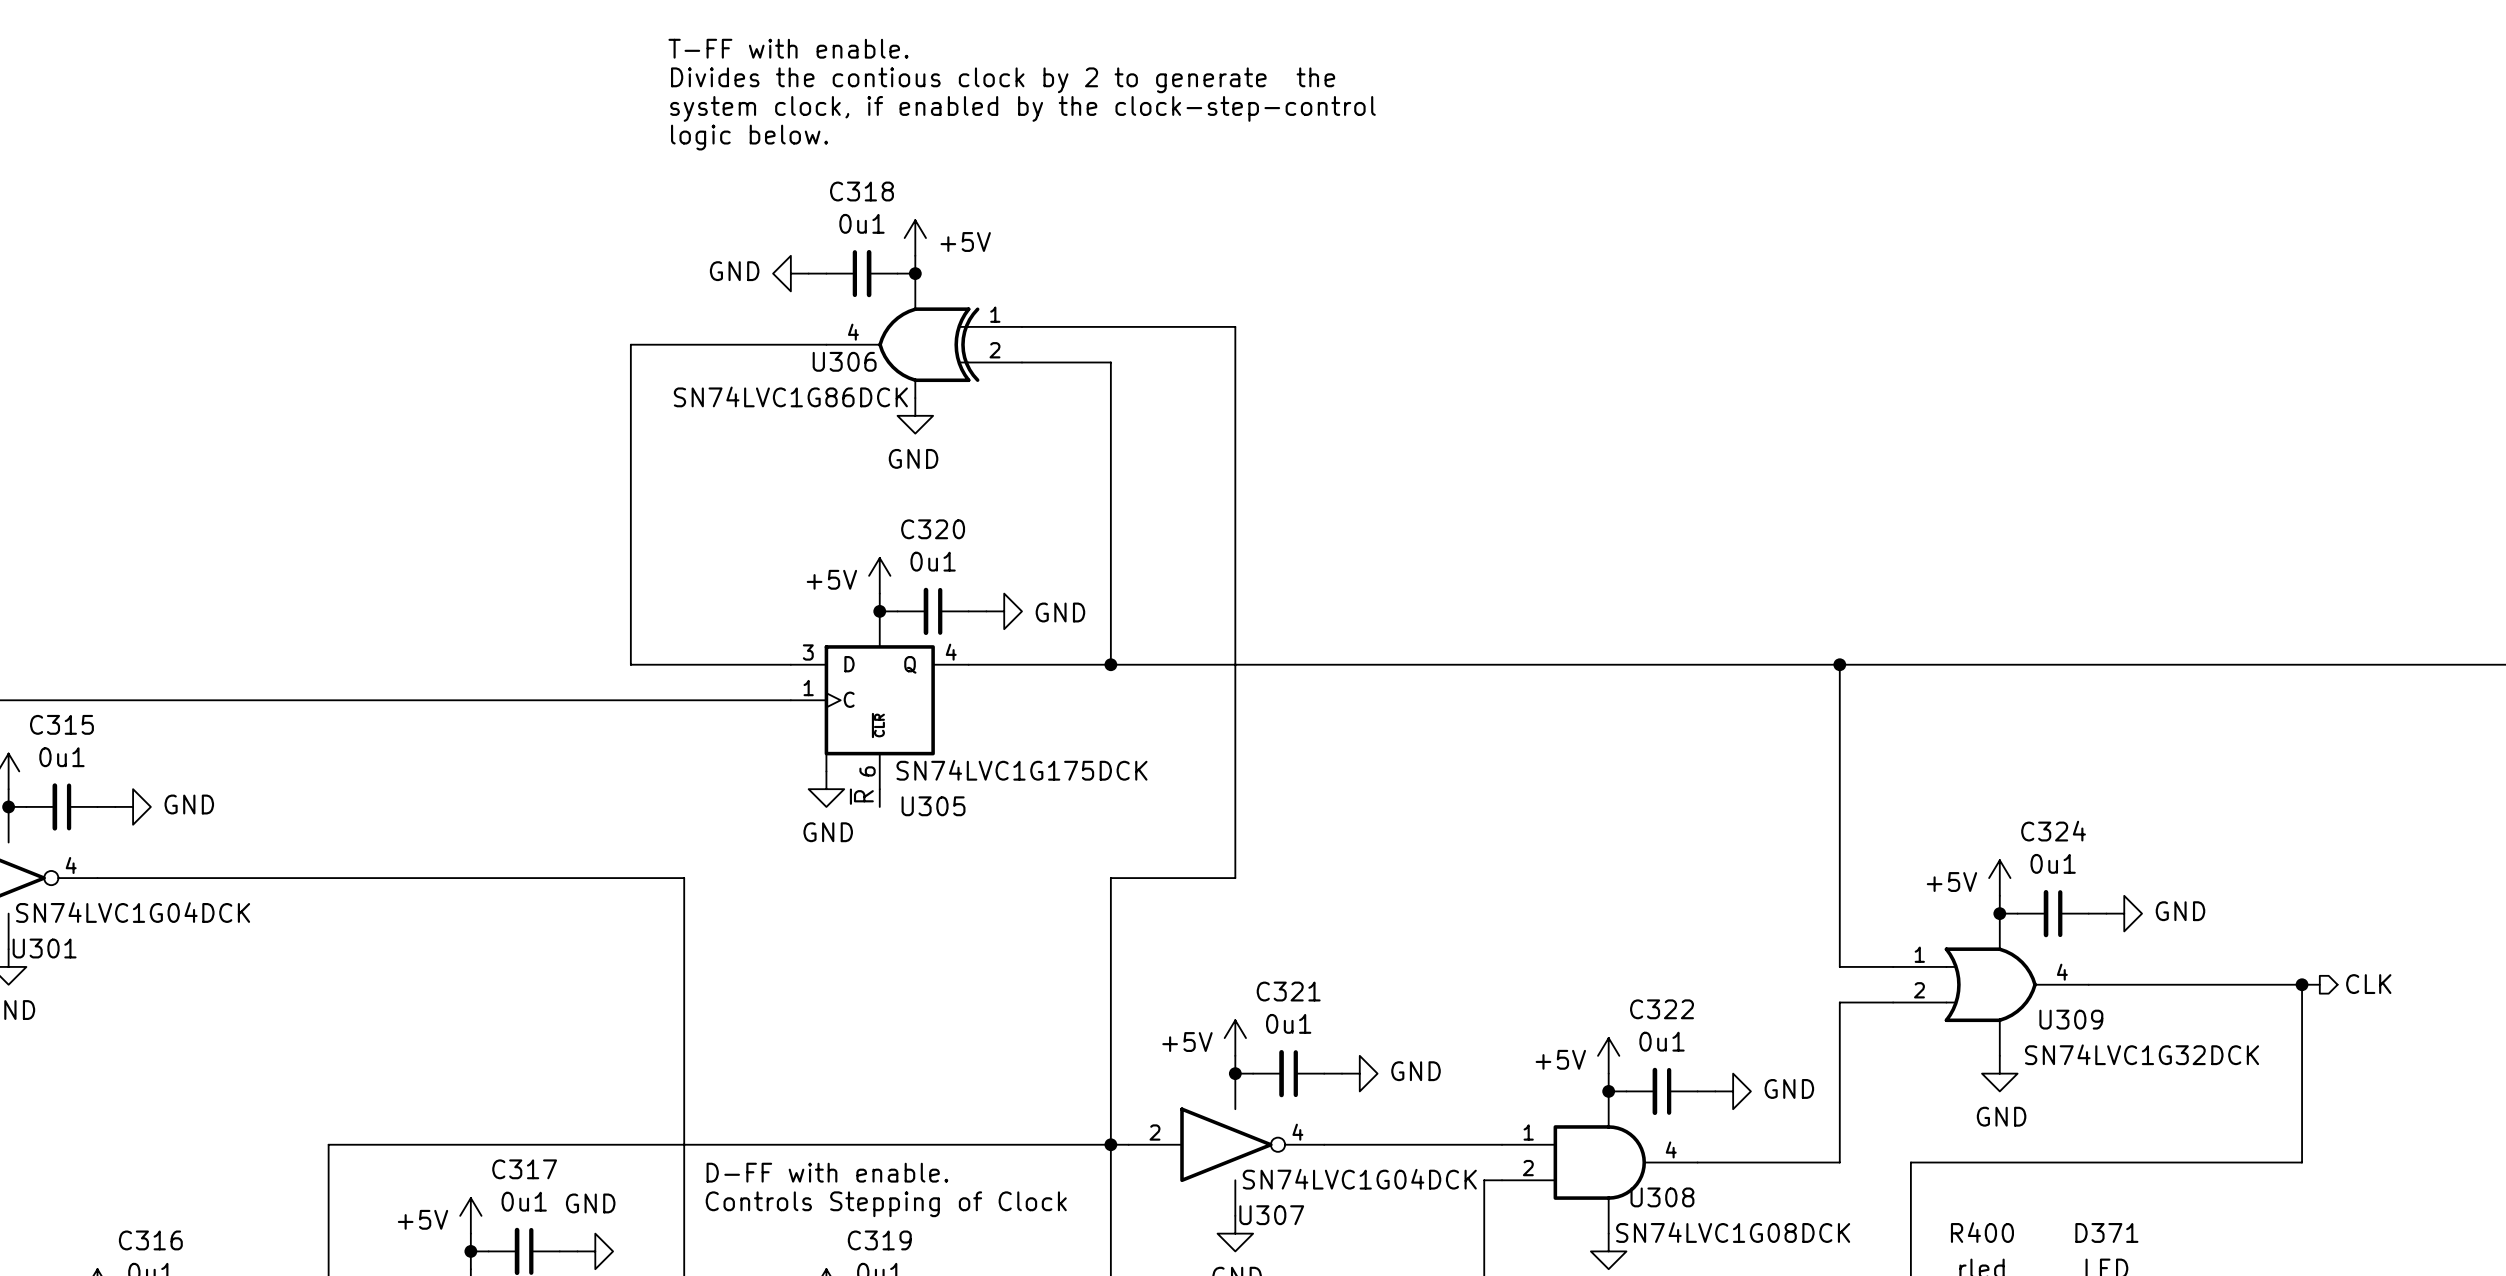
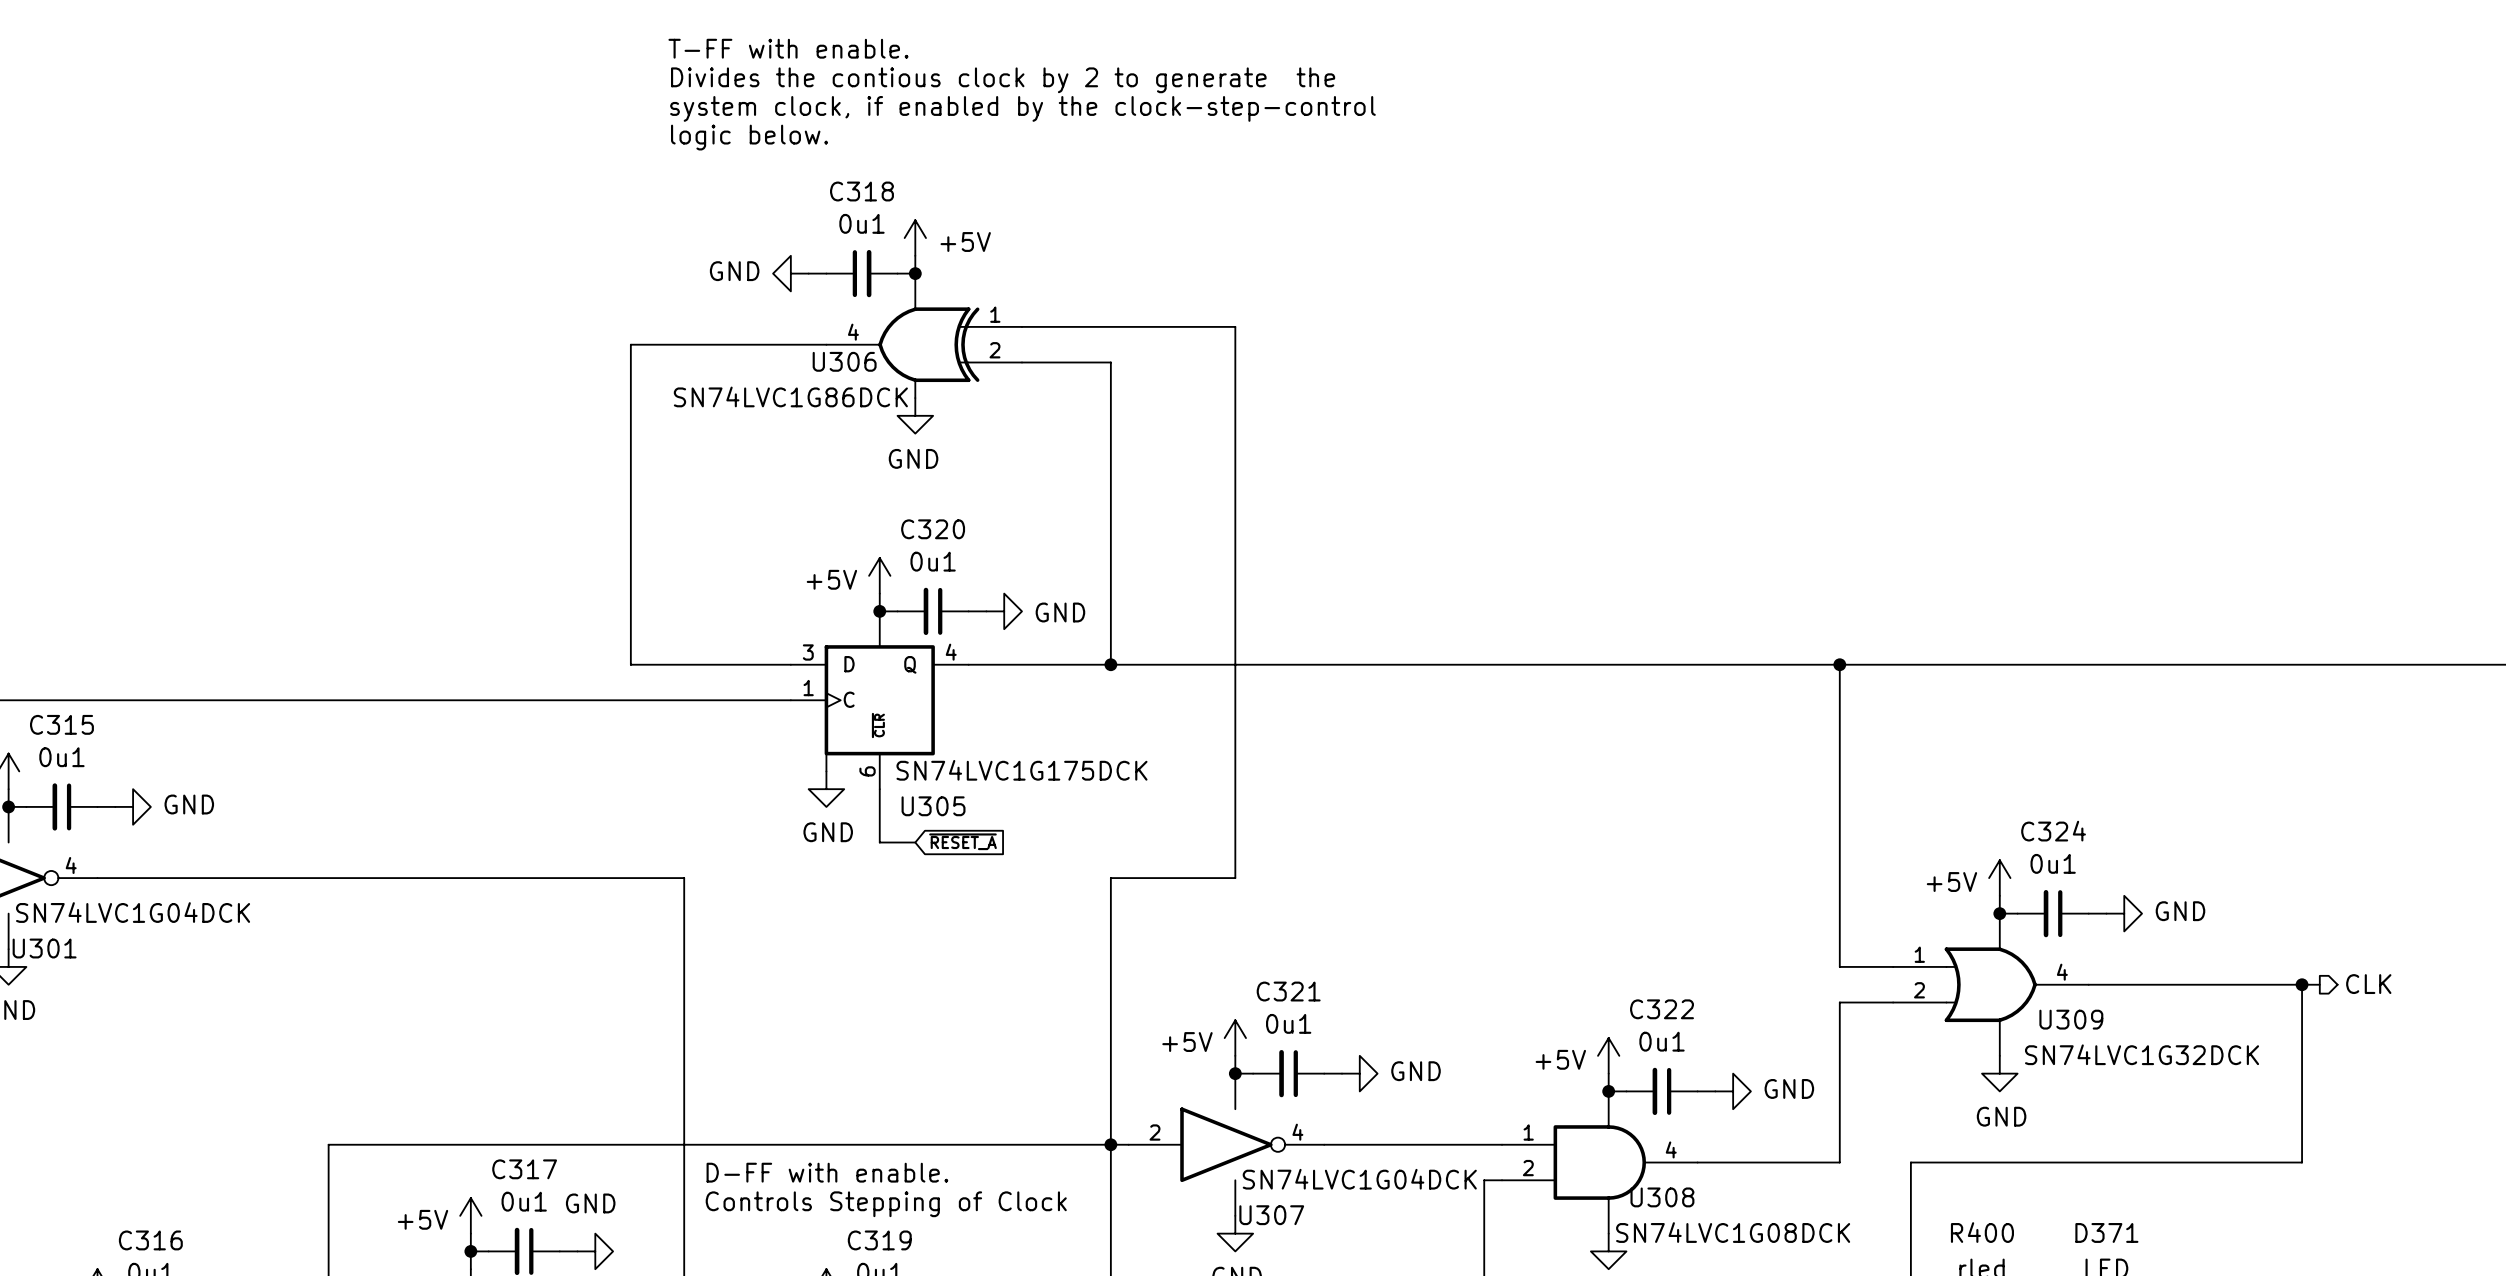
label: ~{R} (861, 796) -> none
wire: none -> (879, 806) (879, 842) (915, 842)
global label: none -> ~{RESET_A} (963, 841)

